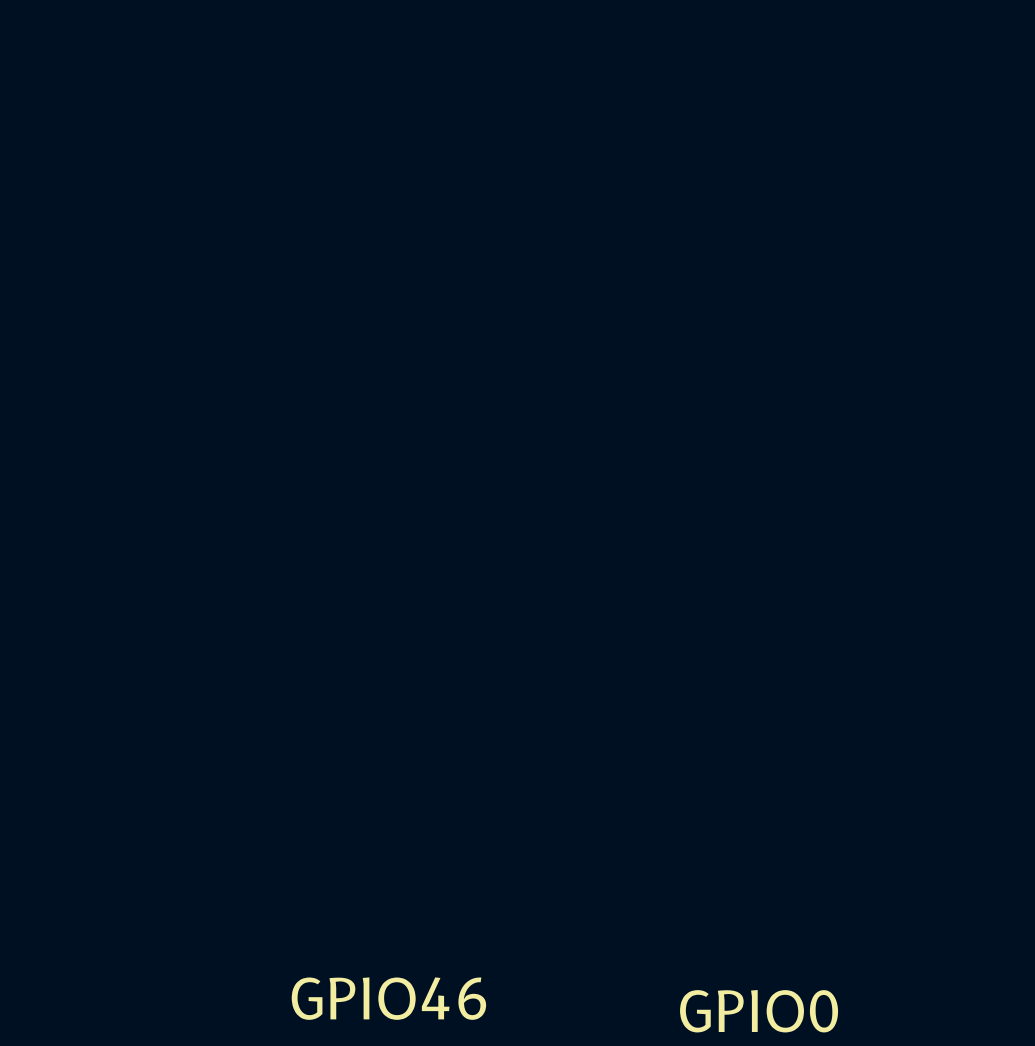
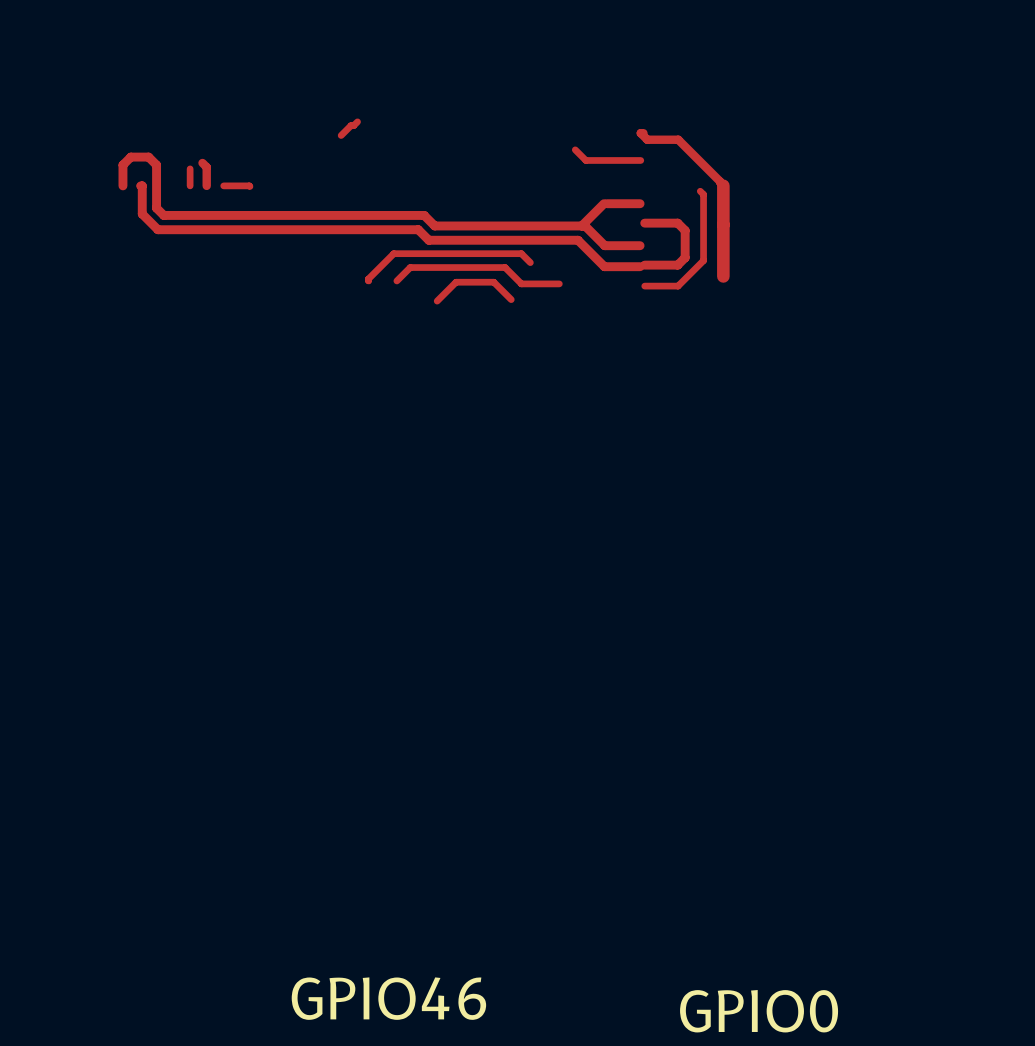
track: none -> (357, 121) (341, 135)
track: none -> (643, 133) (640, 133) (647, 139) (678, 139) (723, 185) (723, 276)
track: none -> (575, 149) (585, 160) (640, 160)
track: none -> (202, 163) (206, 167) (206, 185)
track: none -> (190, 168) (190, 185)
track: none -> (122, 185) (122, 165) (130, 157) (148, 157) (156, 165) (156, 208) (163, 215) (424, 215) (434, 225) (585, 225) (604, 245) (640, 245)
track: none -> (139, 185) (142, 185) (142, 214) (157, 229) (418, 229) (428, 240) (578, 240) (604, 266) (640, 266)
track: none -> (223, 185) (249, 186)
track: none -> (700, 191) (703, 194) (703, 260) (678, 286) (644, 286)
track: none -> (640, 203) (603, 203) (581, 225)
track: none -> (644, 223) (677, 223) (685, 230) (685, 257) (677, 265) (644, 265)
track: none -> (530, 262) (521, 253) (393, 253) (368, 280)
track: none -> (396, 280) (410, 267) (505, 267) (521, 283) (559, 283)
track: none -> (511, 299) (493, 282) (456, 282) (437, 301)

